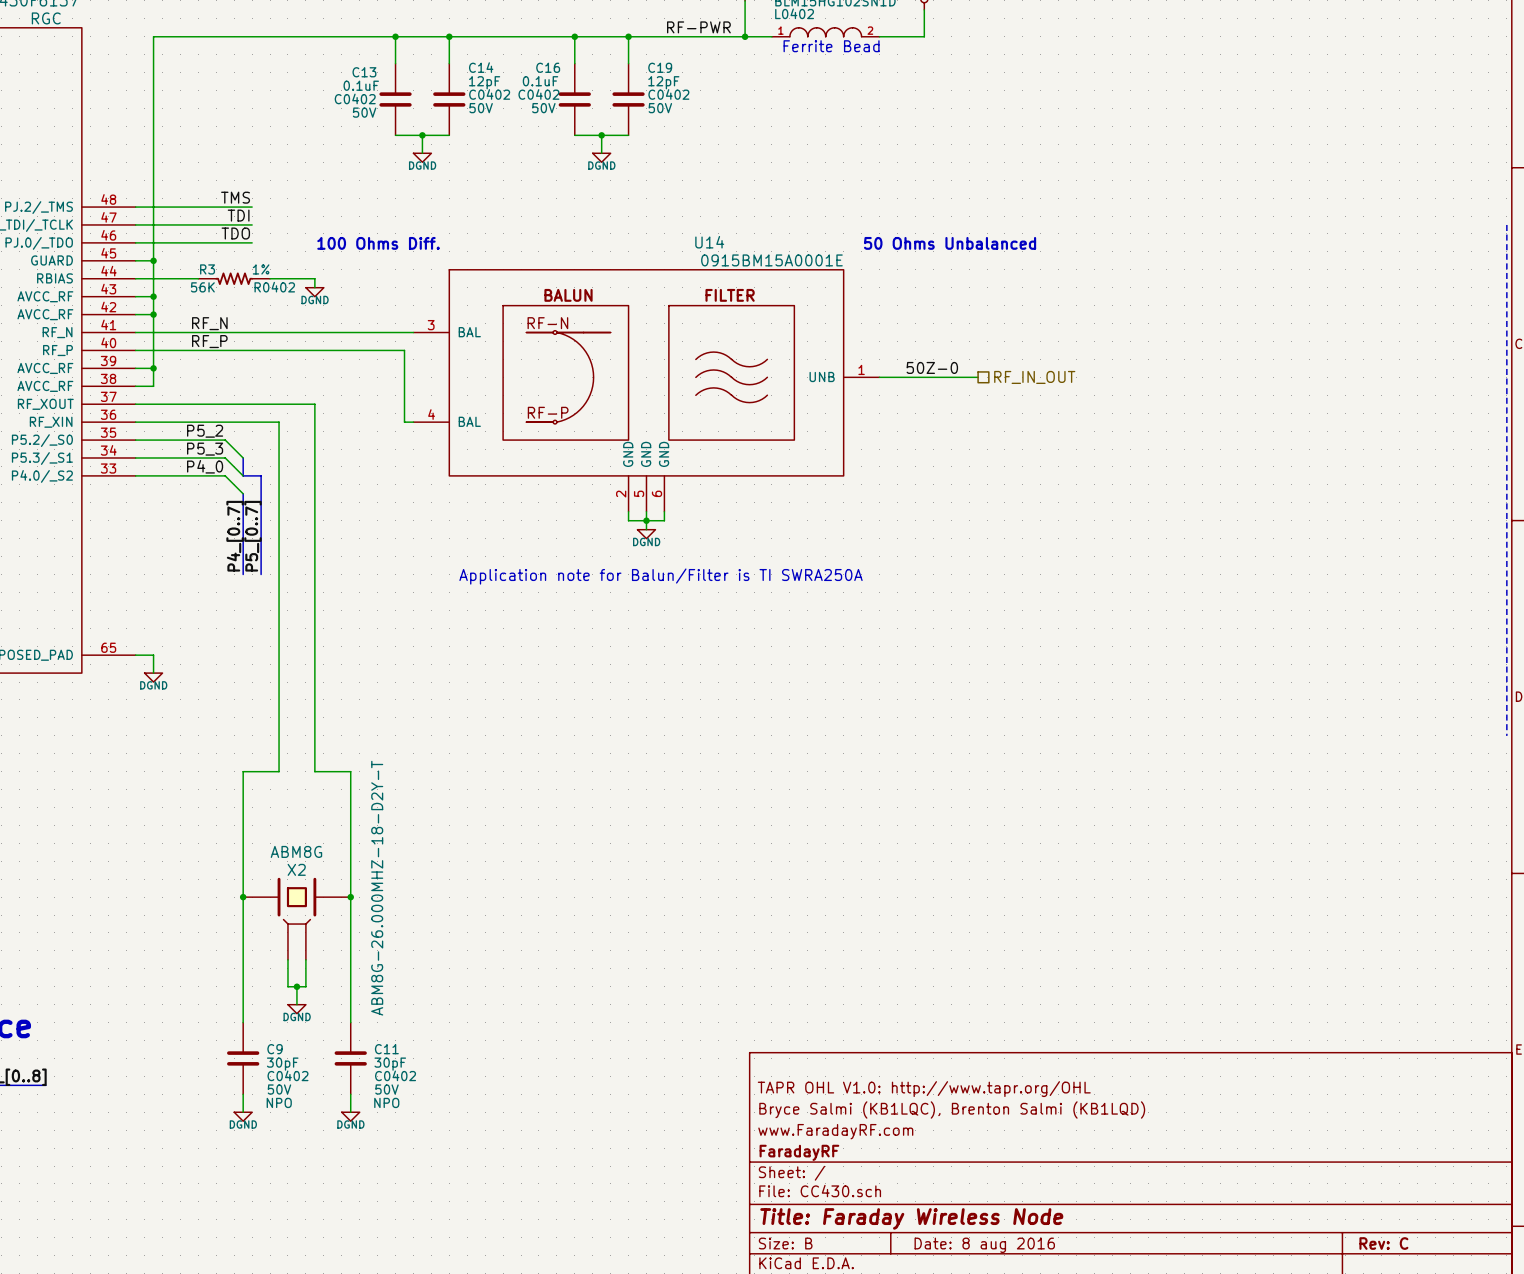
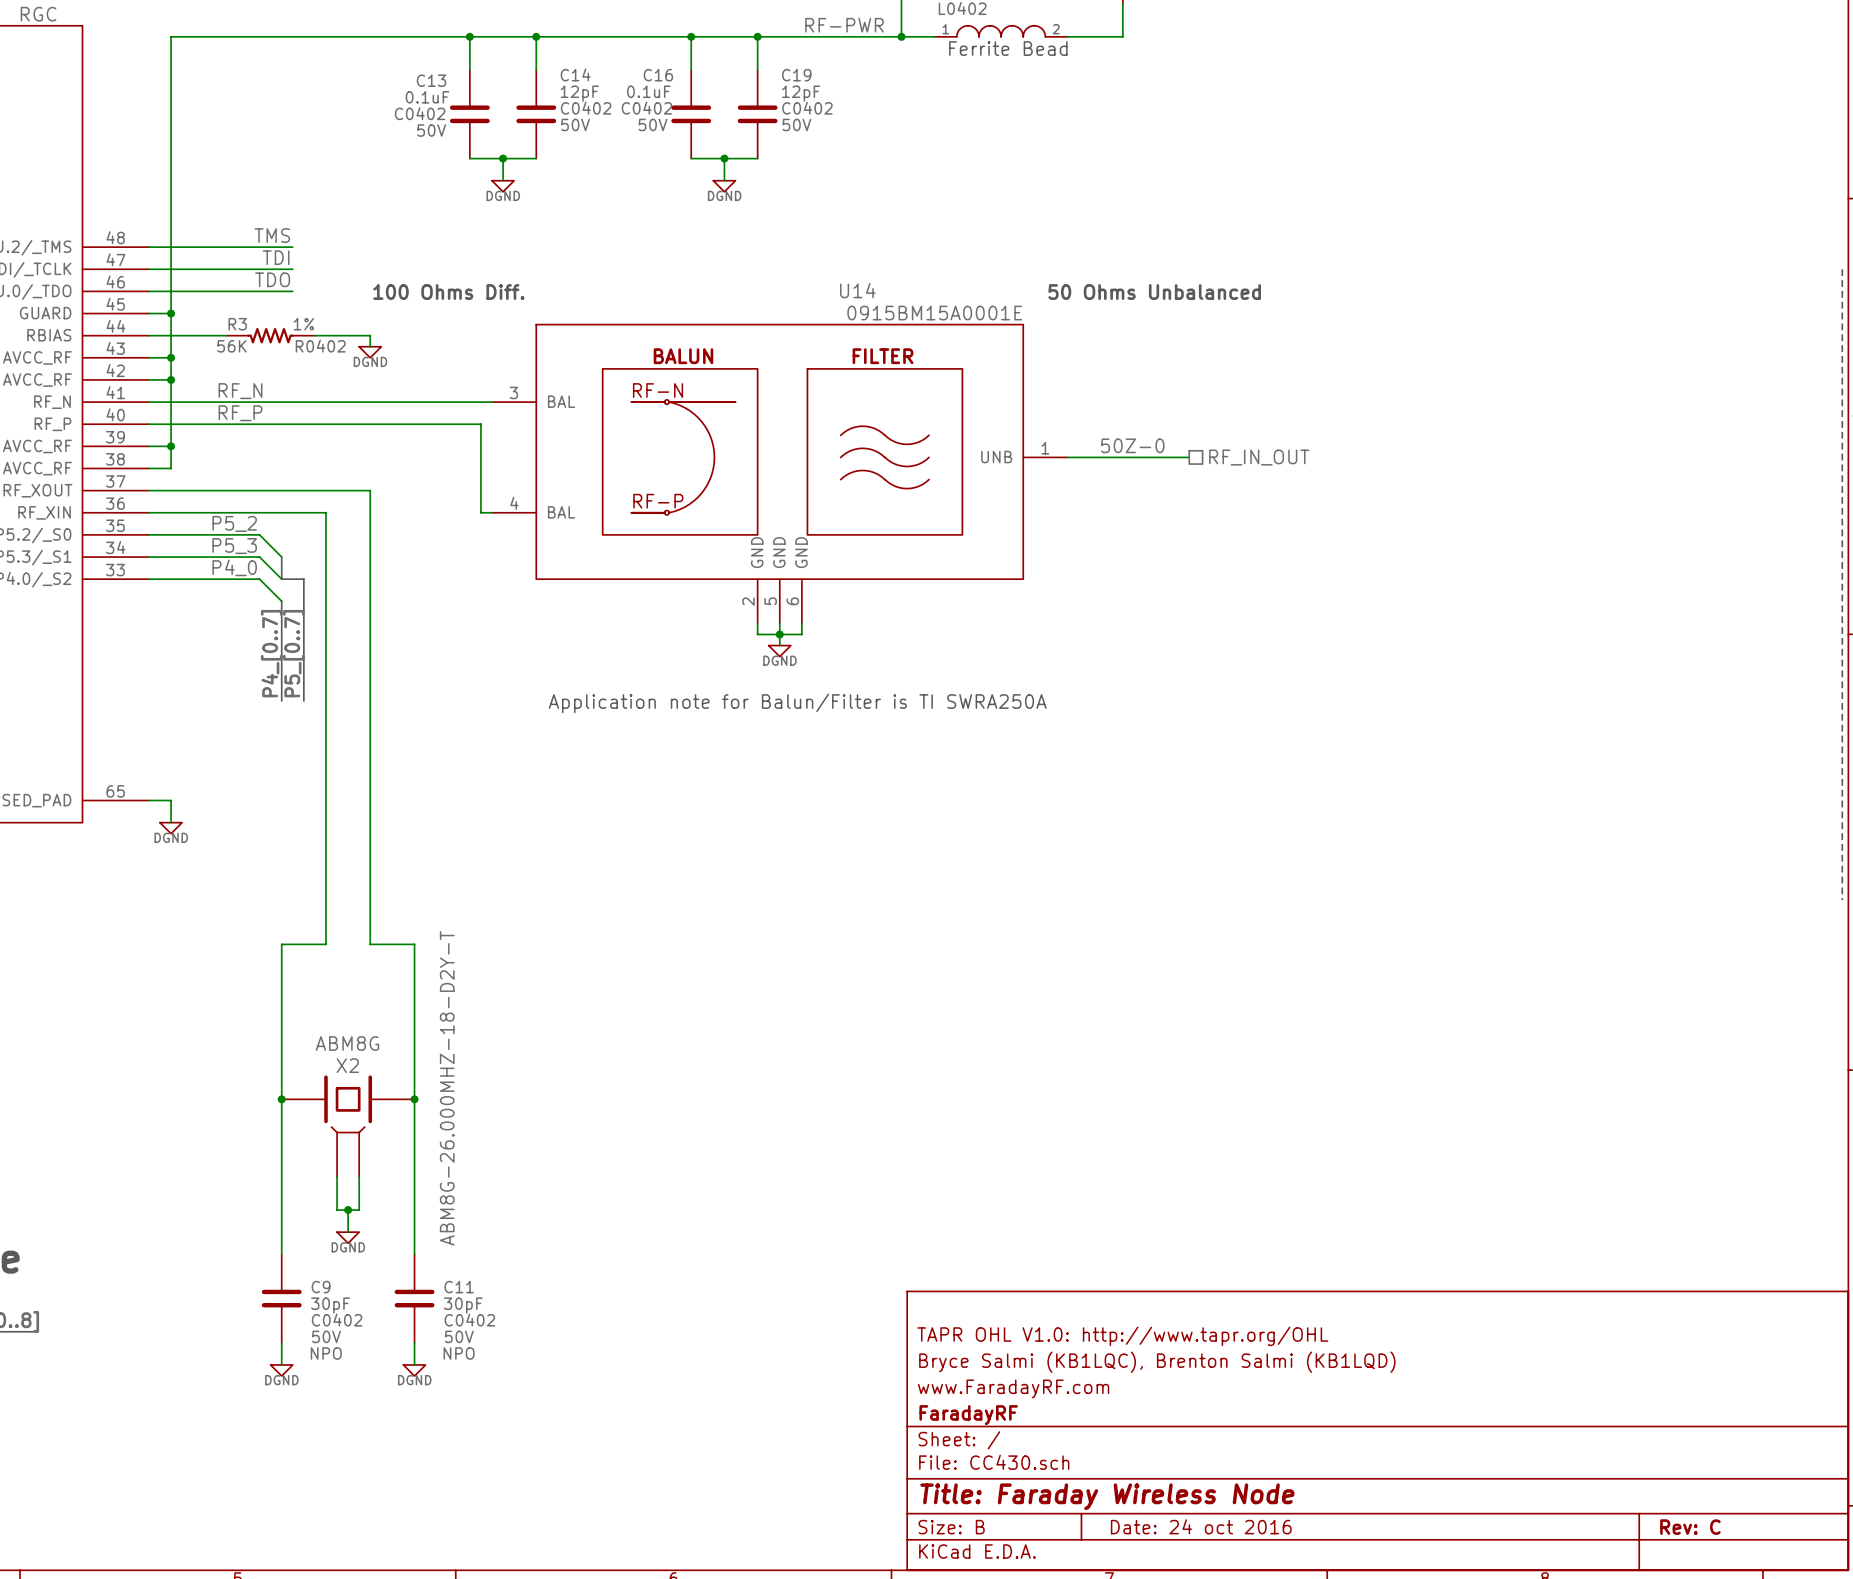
title block: Date: 8 aug 2016 (984, 1245) -> Date: 24 oct 2016 (1201, 1526)

